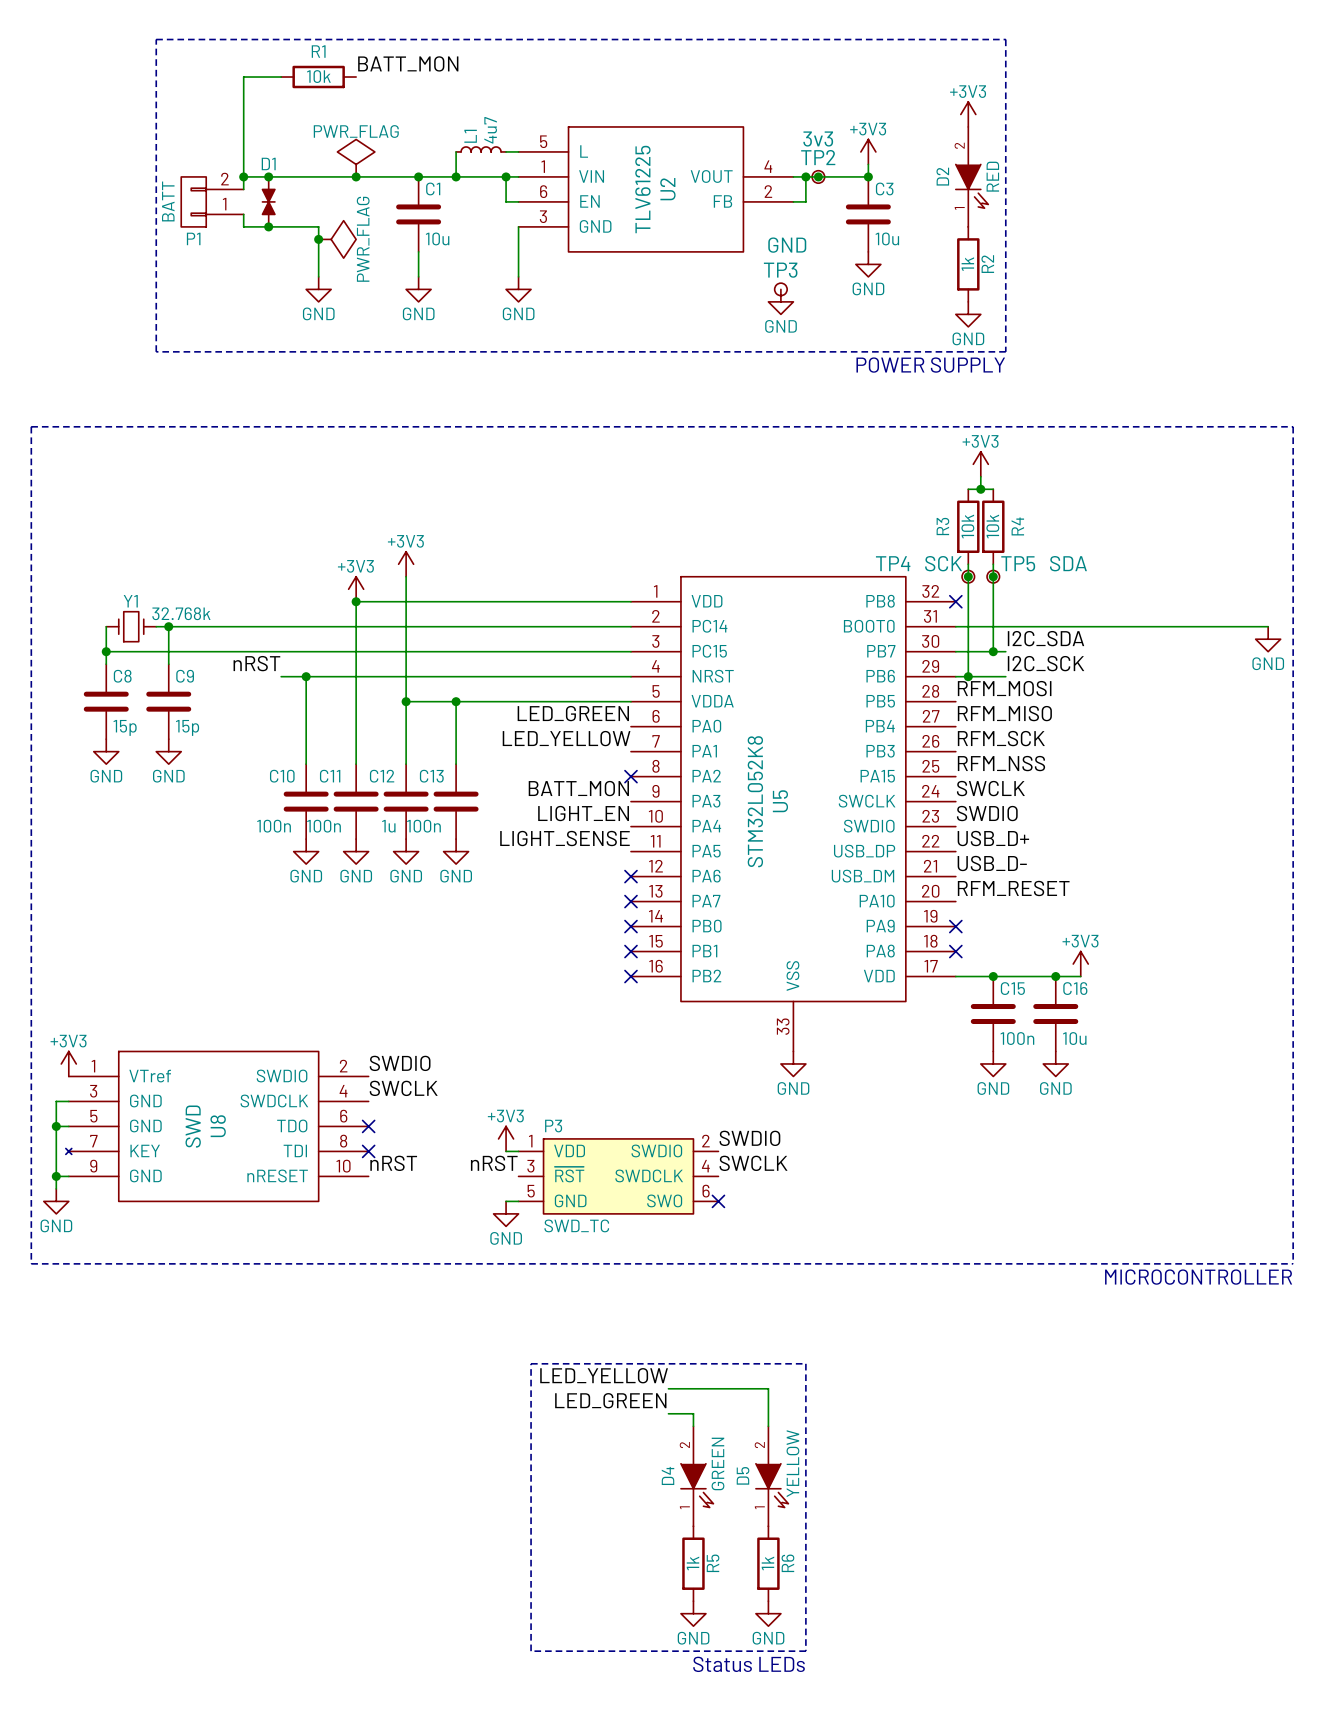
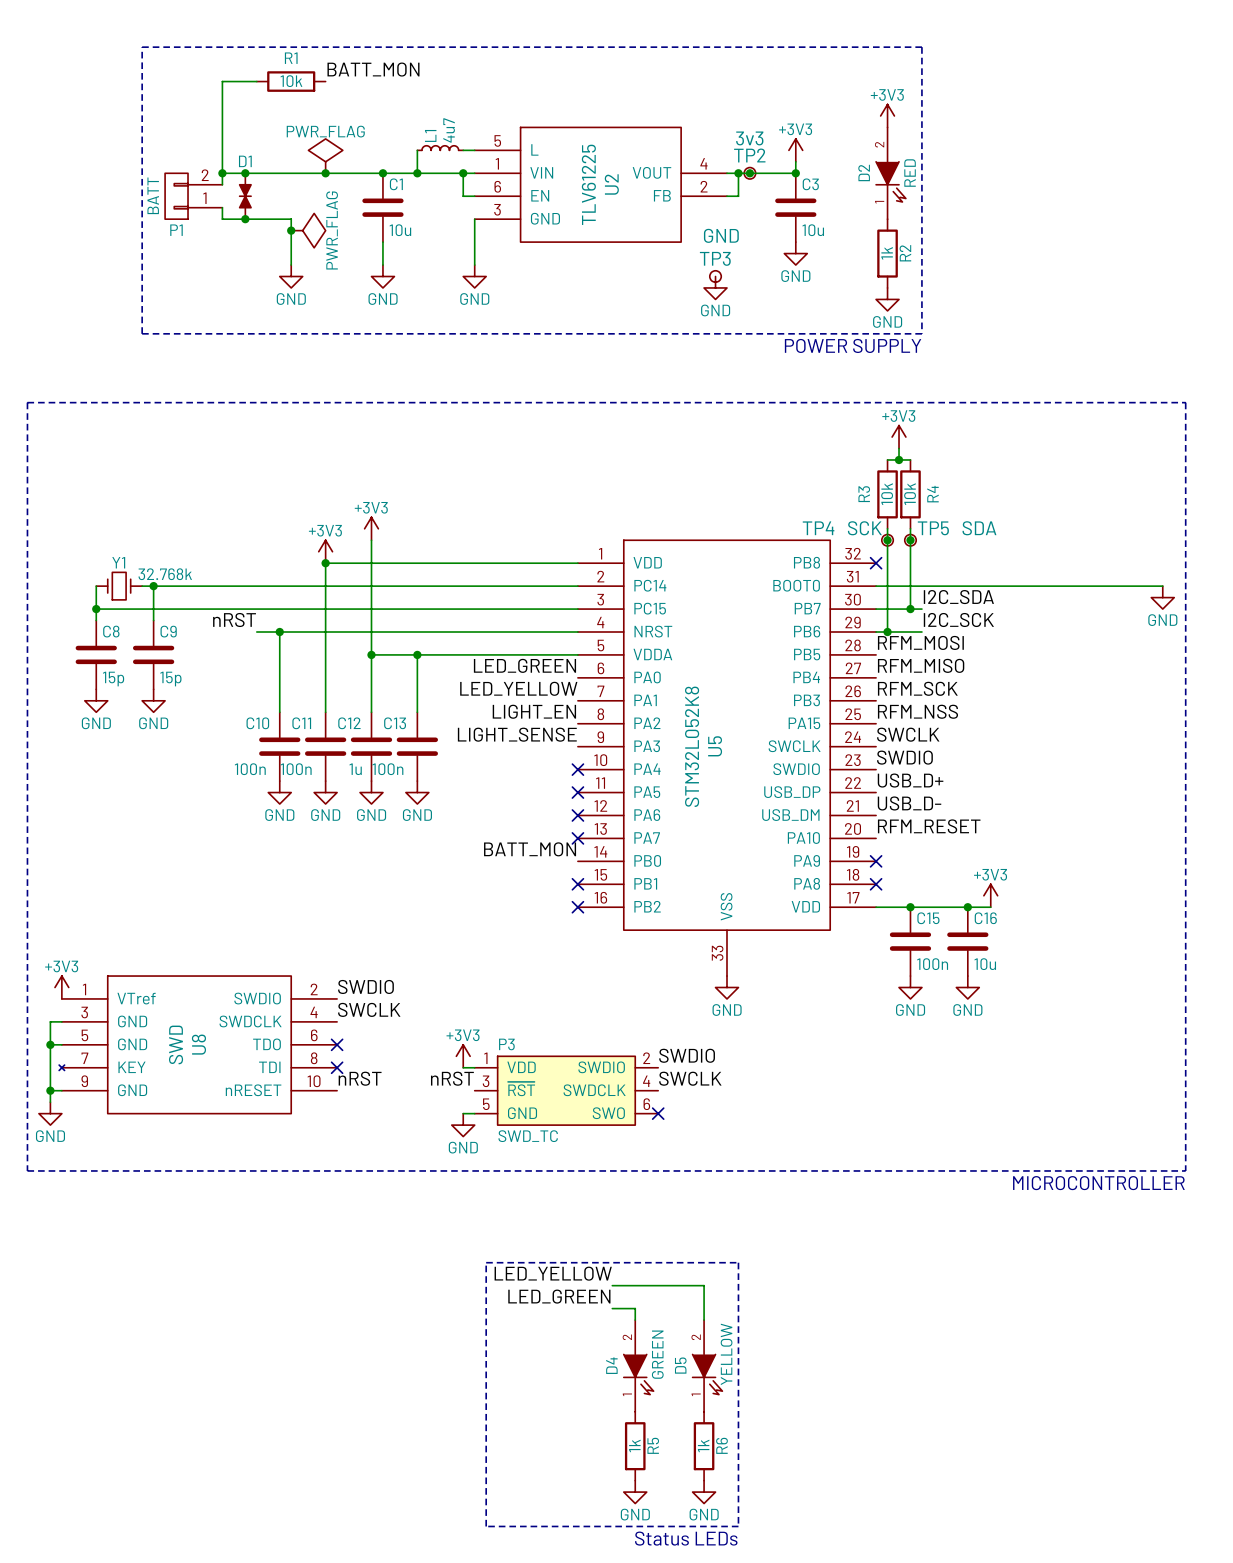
no-connect mark: (630, 776) -> none
label: BATT_MON (578, 788) -> LIGHT_SENSE (517, 734)
label position: LIGHT_EN (583, 813) -> LIGHT_EN (534, 711)
no-connect mark: none -> (577, 769)
label: LIGHT_SENSE (564, 838) -> none
no-connect mark: none -> (577, 792)
label: none -> BATT_MON (530, 849)
no-connect mark: (630, 926) -> none

